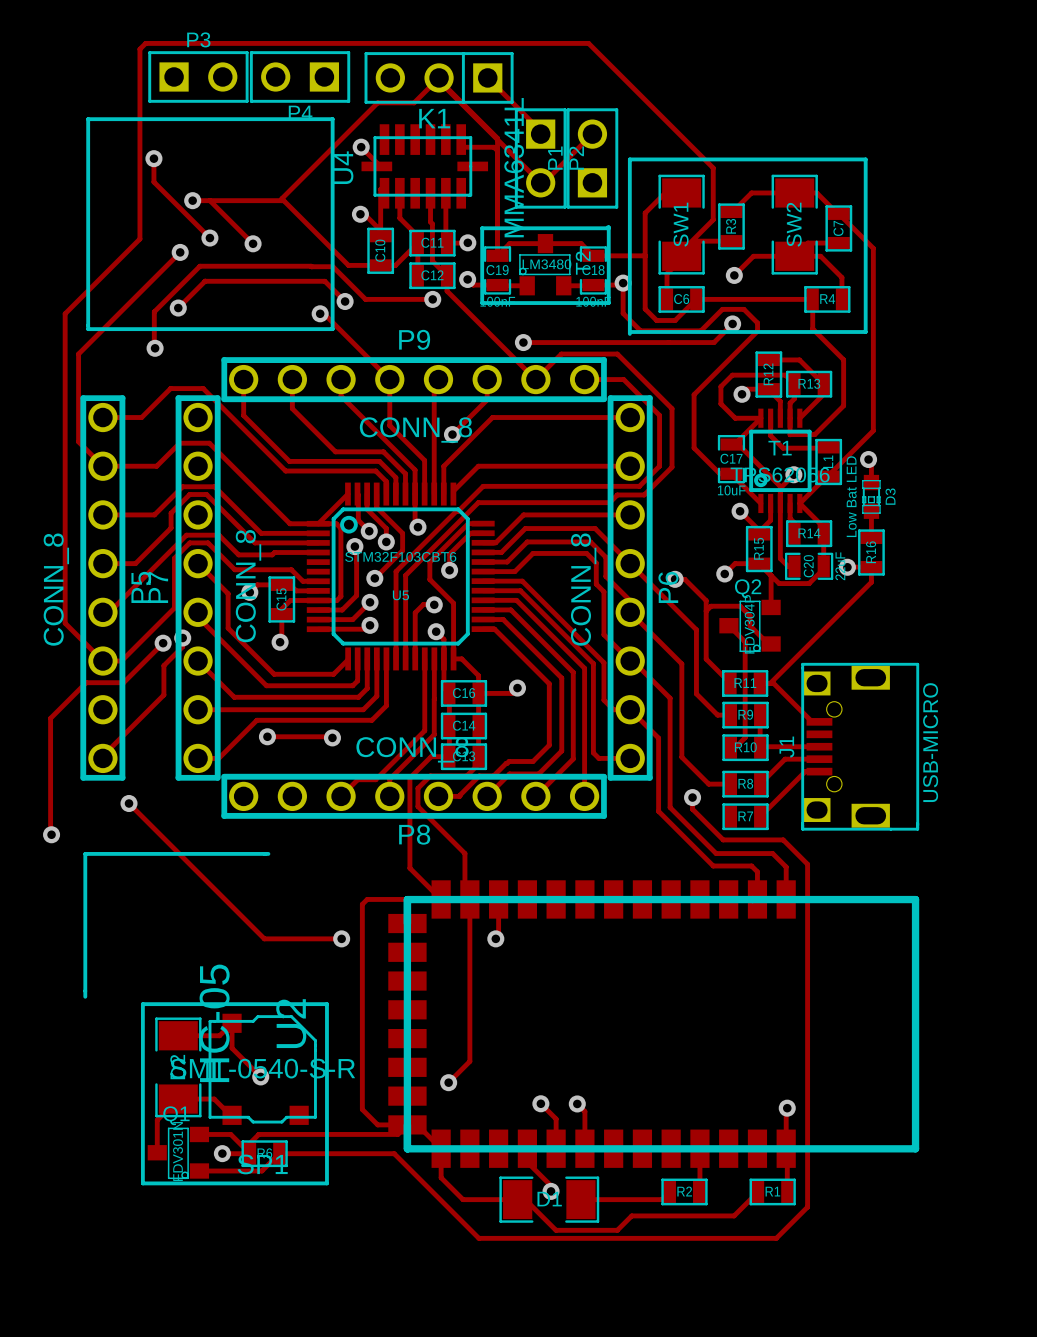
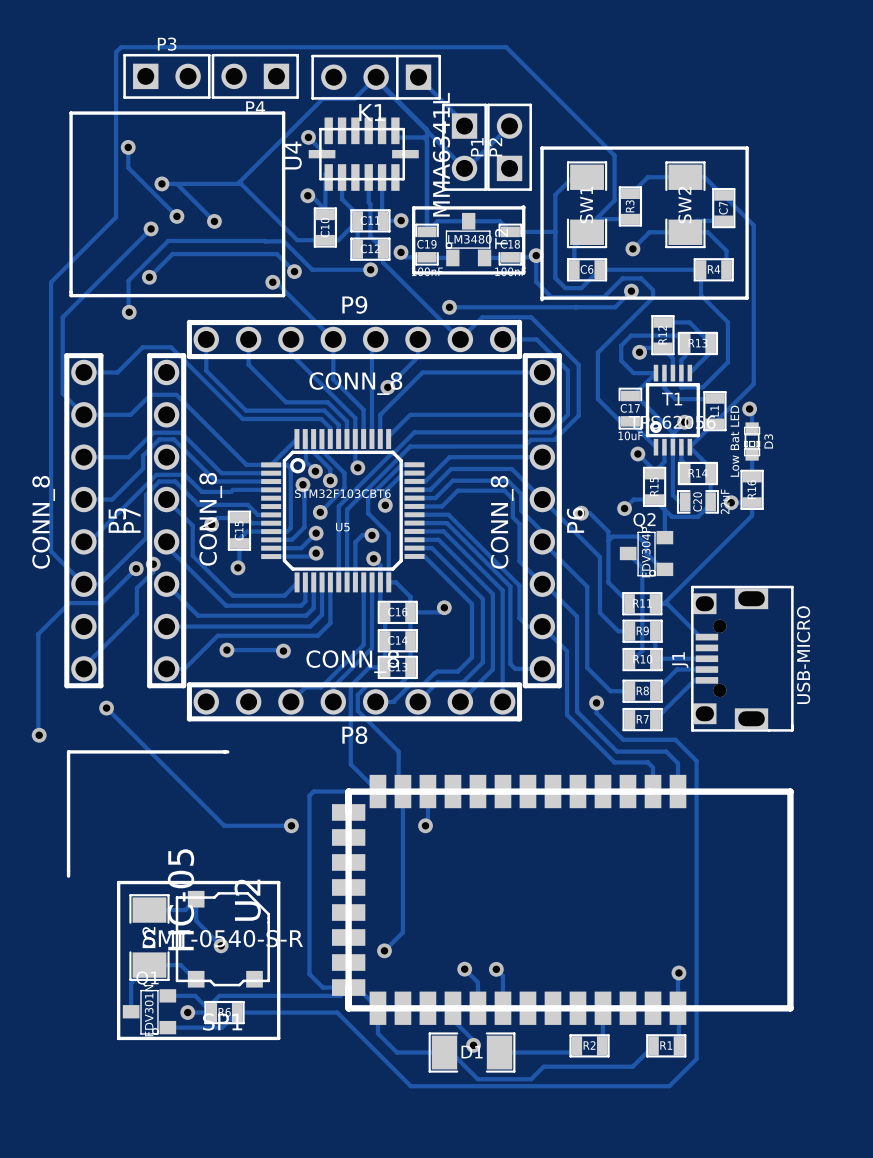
J1 footprint: [801, 662, 920, 831] -> [691, 585, 794, 732]

